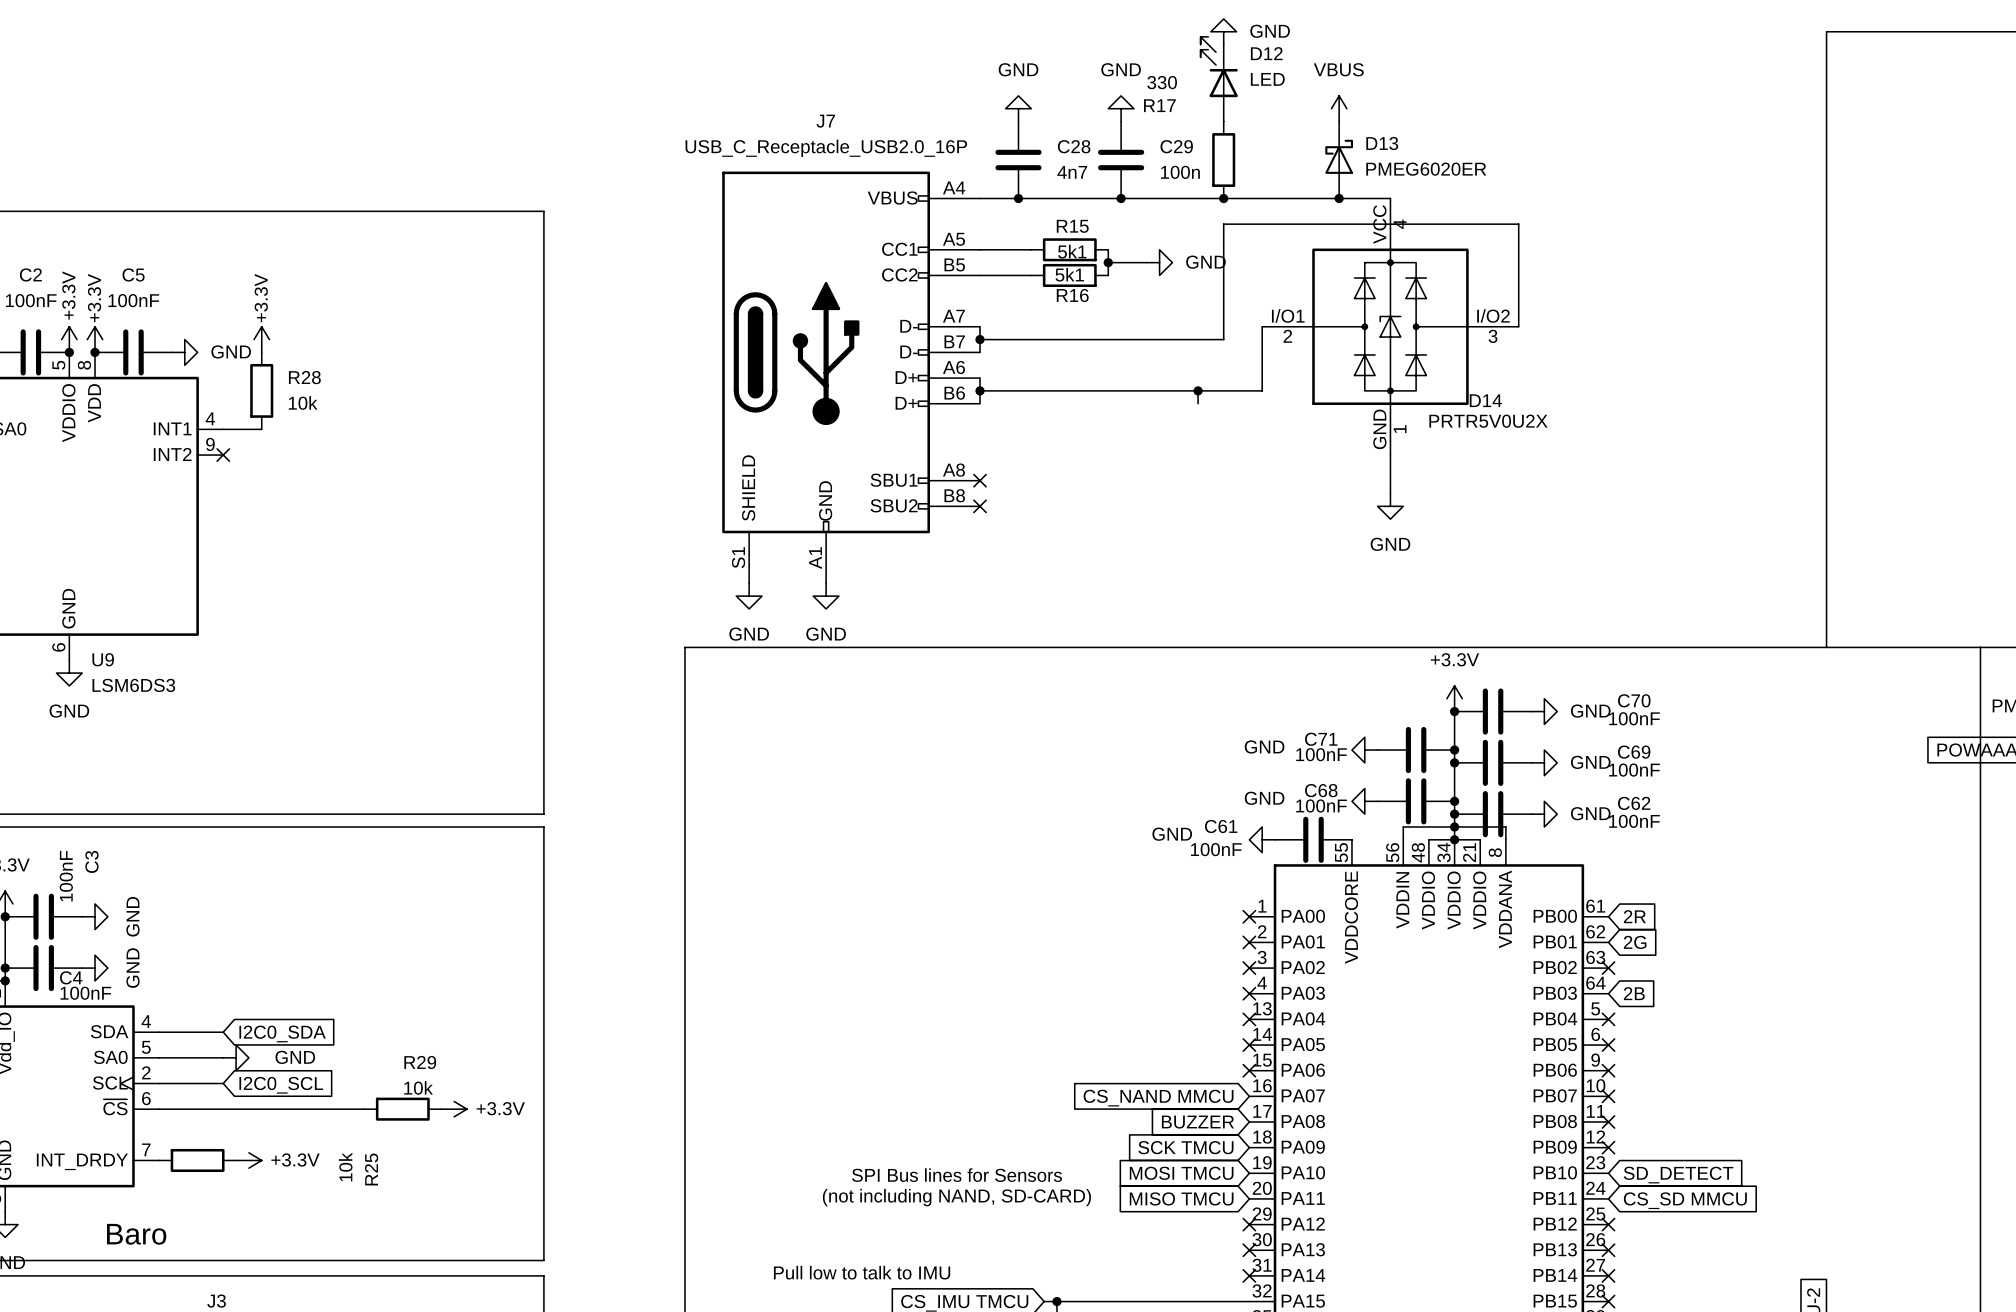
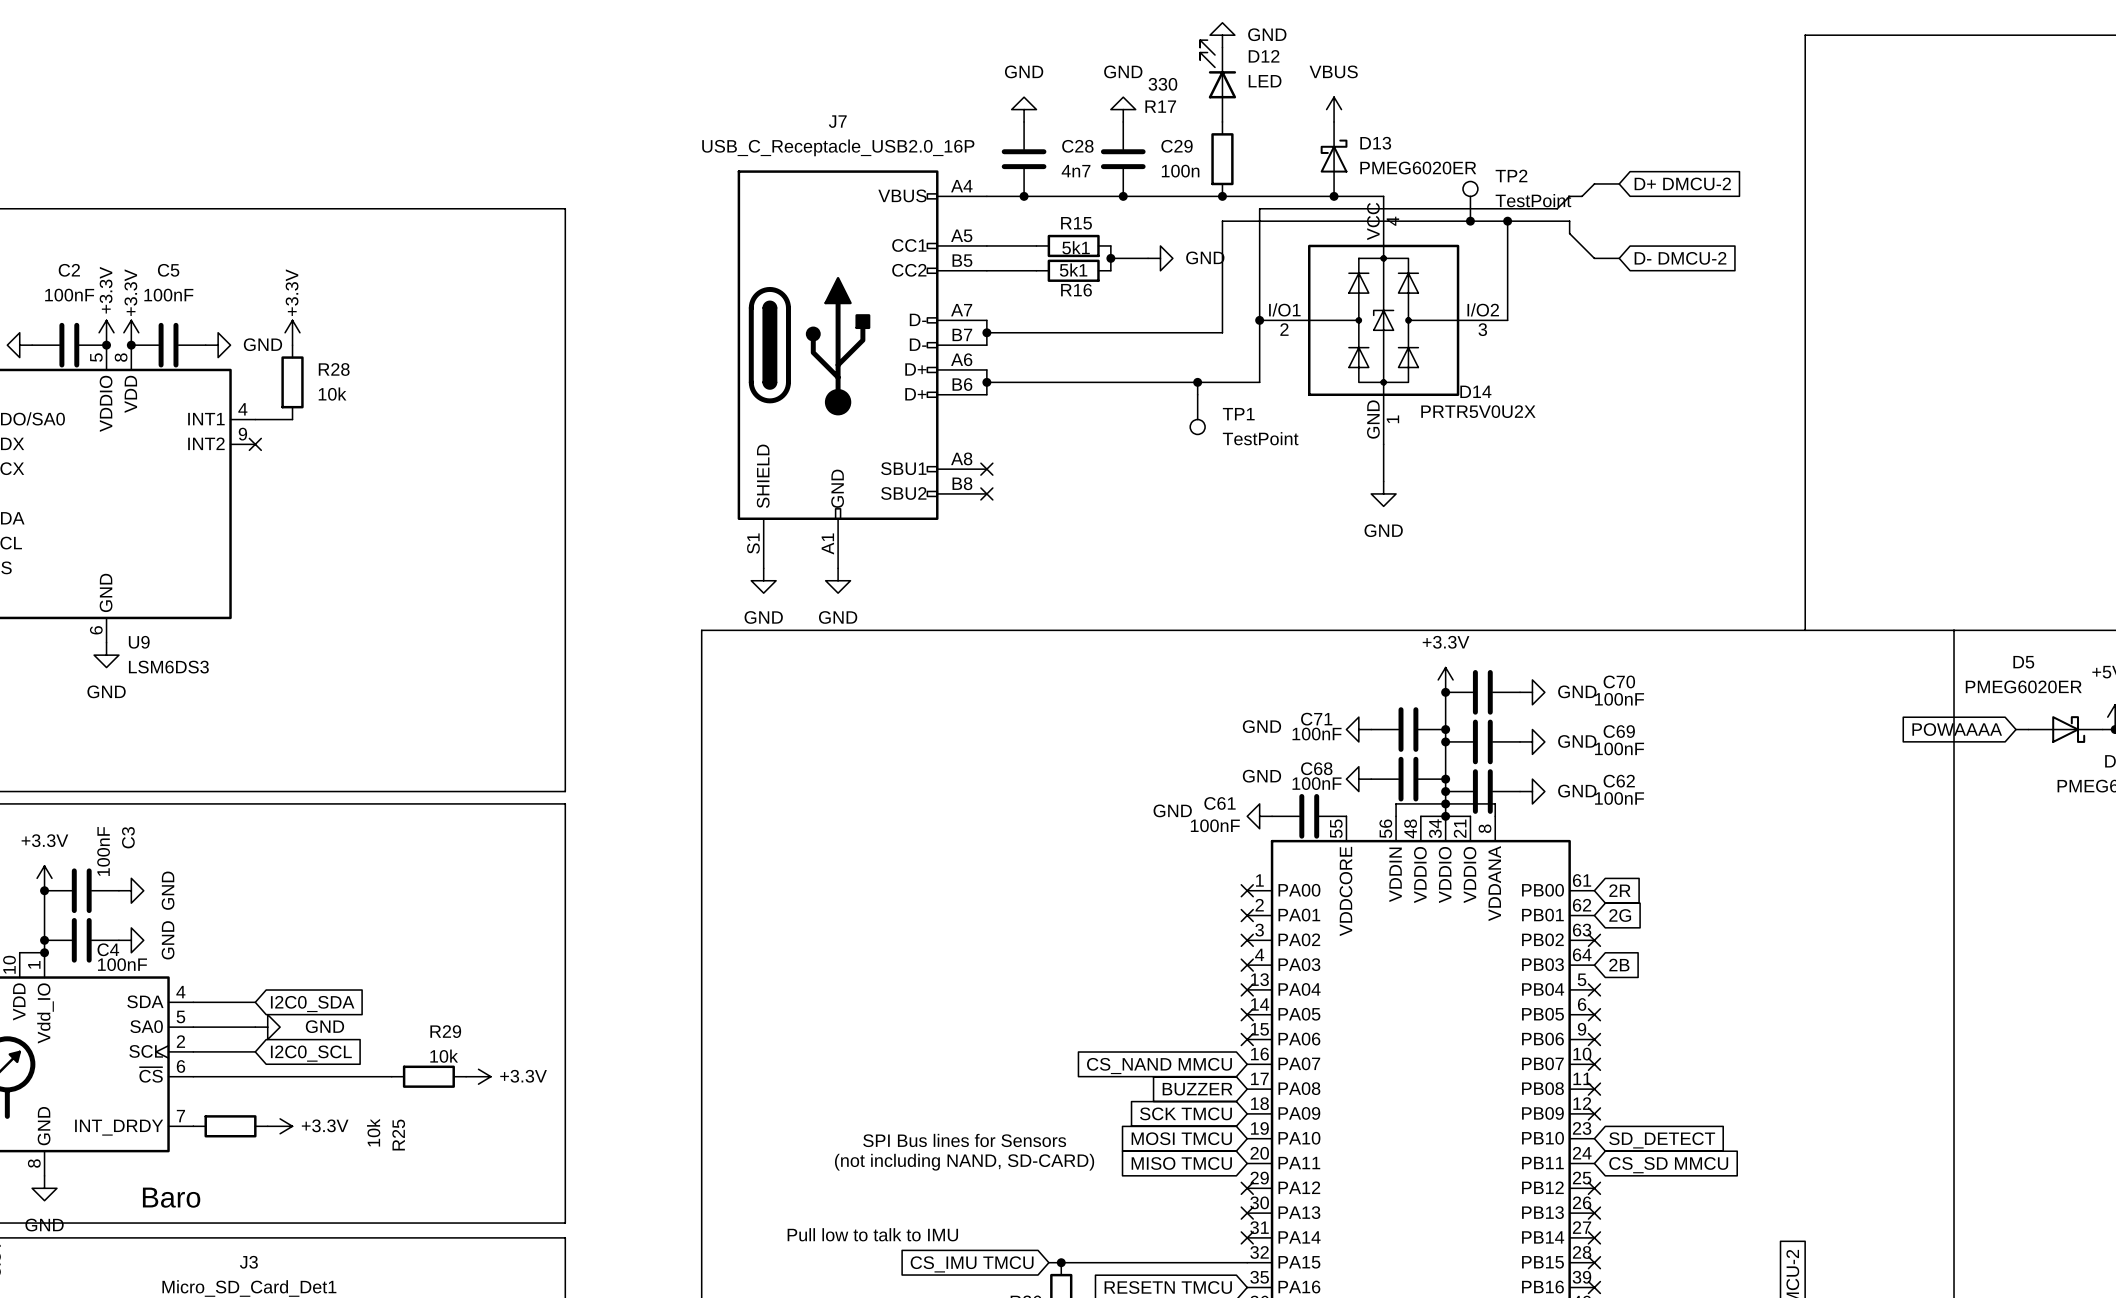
wire: none -> (1619, 183) (1594, 183) (1582, 196) (1569, 196) (1557, 208) (1259, 208) (1259, 320)
global label: none -> D+ DMCU-2 (1682, 183)
TP2: none -> TestPoint (1470, 201)
junction: none -> (1470, 221)
wire: none -> (1507, 221) (1569, 221) (1569, 233) (1594, 258) (1619, 258)
junction: none -> (1507, 221)
global label: none -> D- DMCU-2 (1680, 258)
junction: none -> (1259, 320)
TP1: none -> TestPoint (1197, 414)

